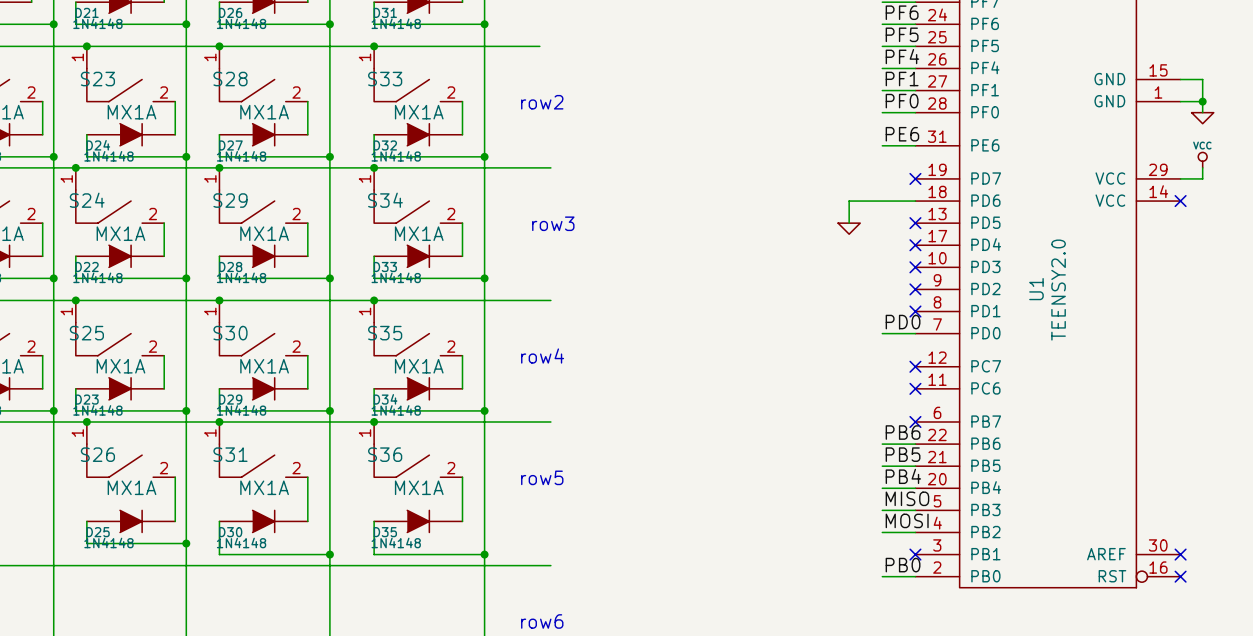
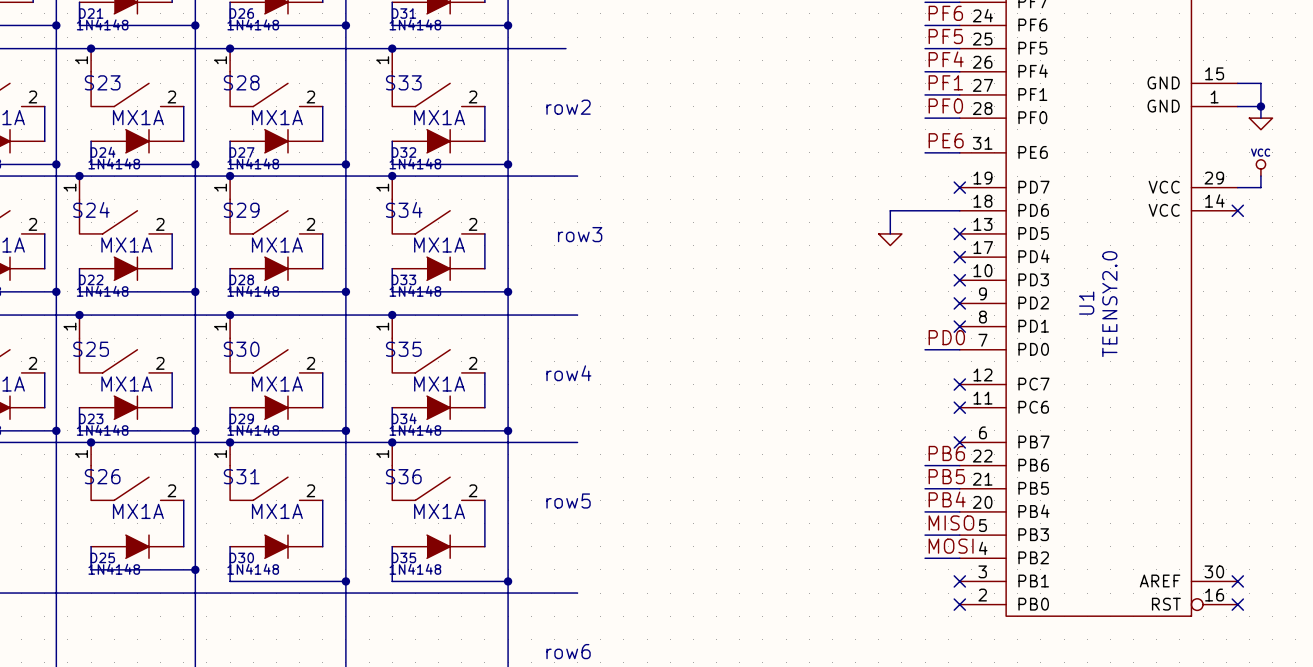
label: PB0 (903, 565) -> none
wire: (882, 576) (915, 576) -> none
no-connect mark: none -> (959, 604)

